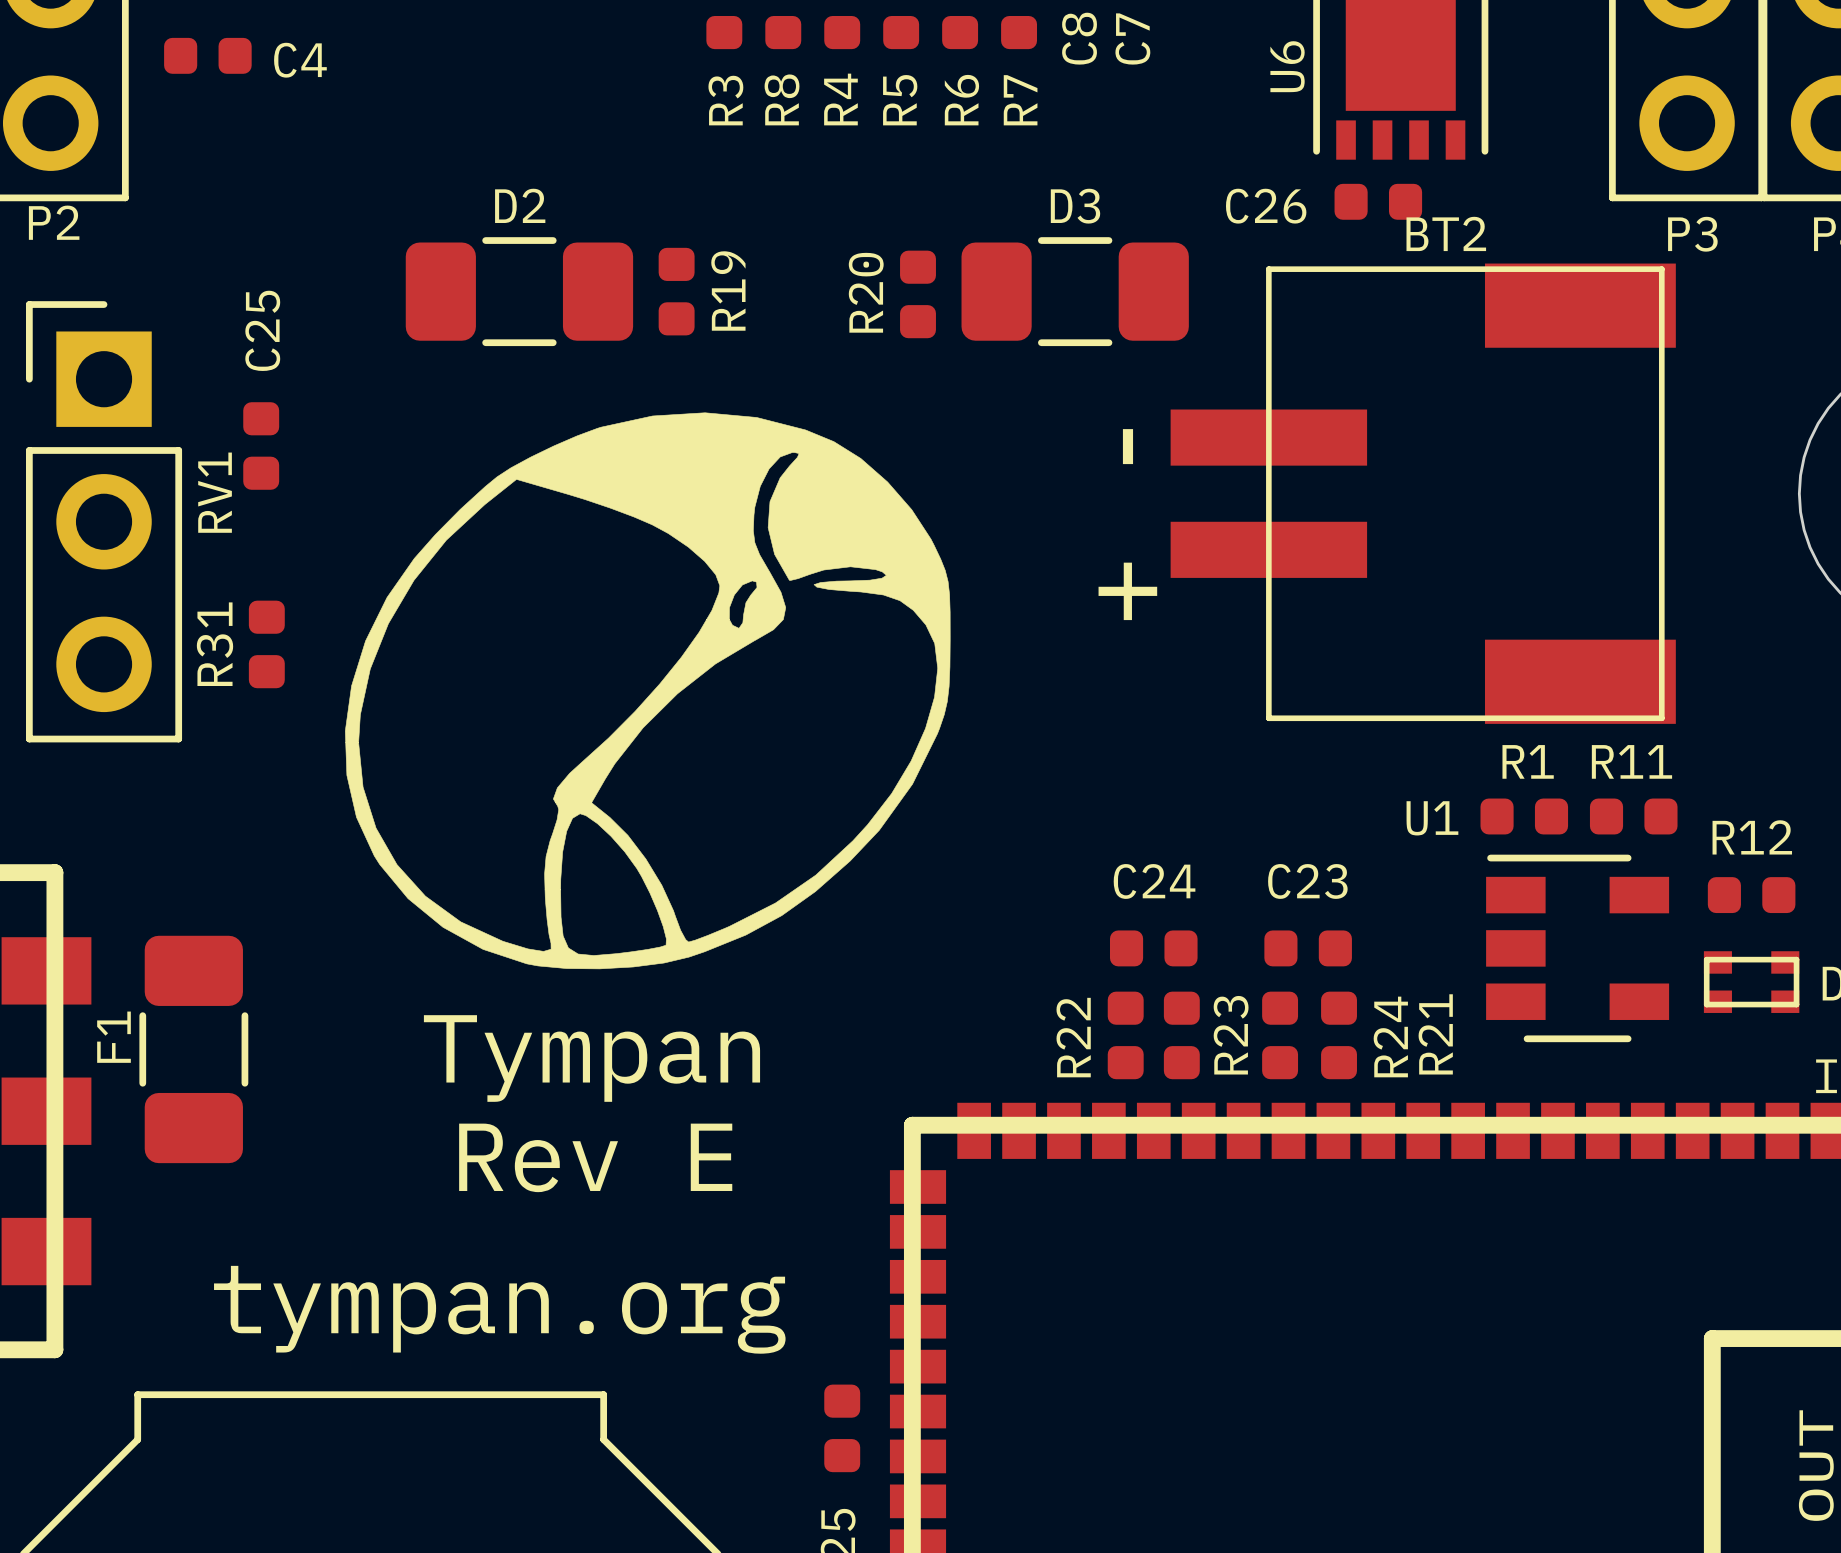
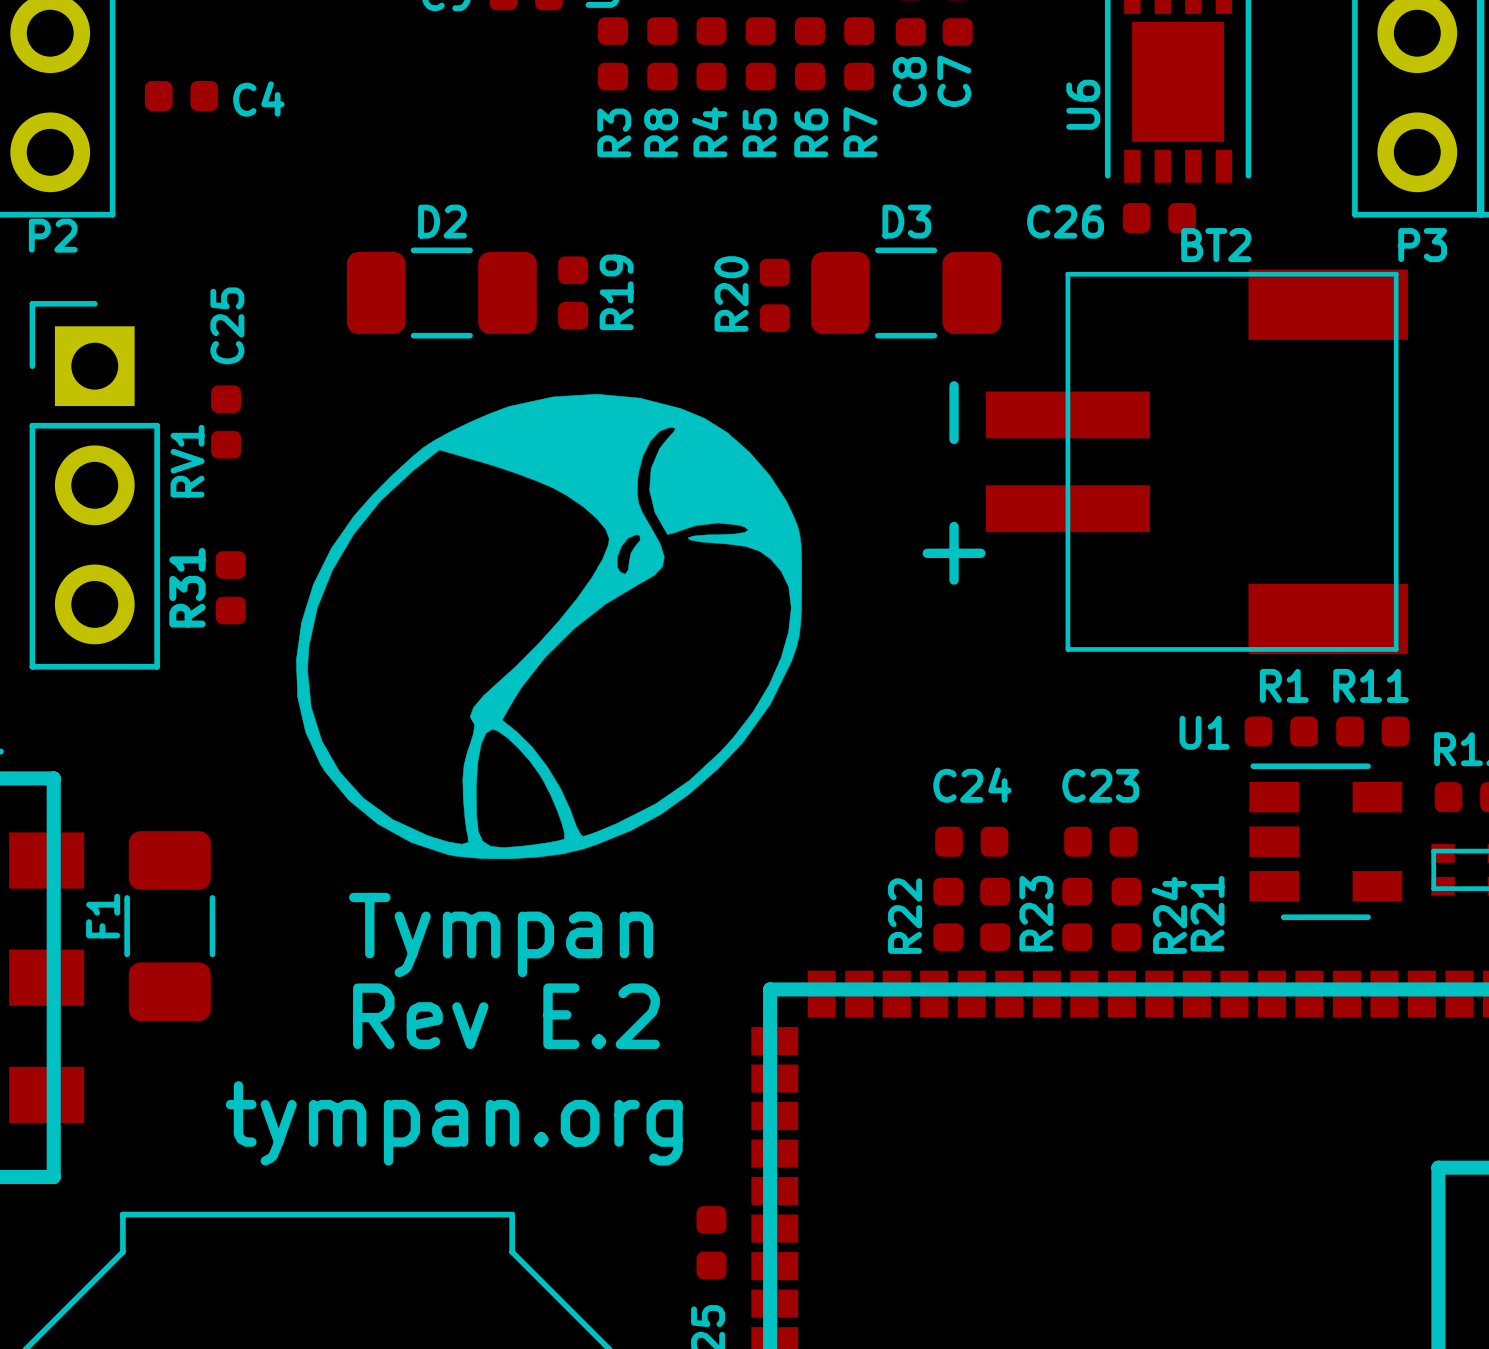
text: Rev E (595, 1157) -> Rev E.2 (506, 1016)
text position: tympan.org (499, 1309) -> tympan.org (454, 1123)

